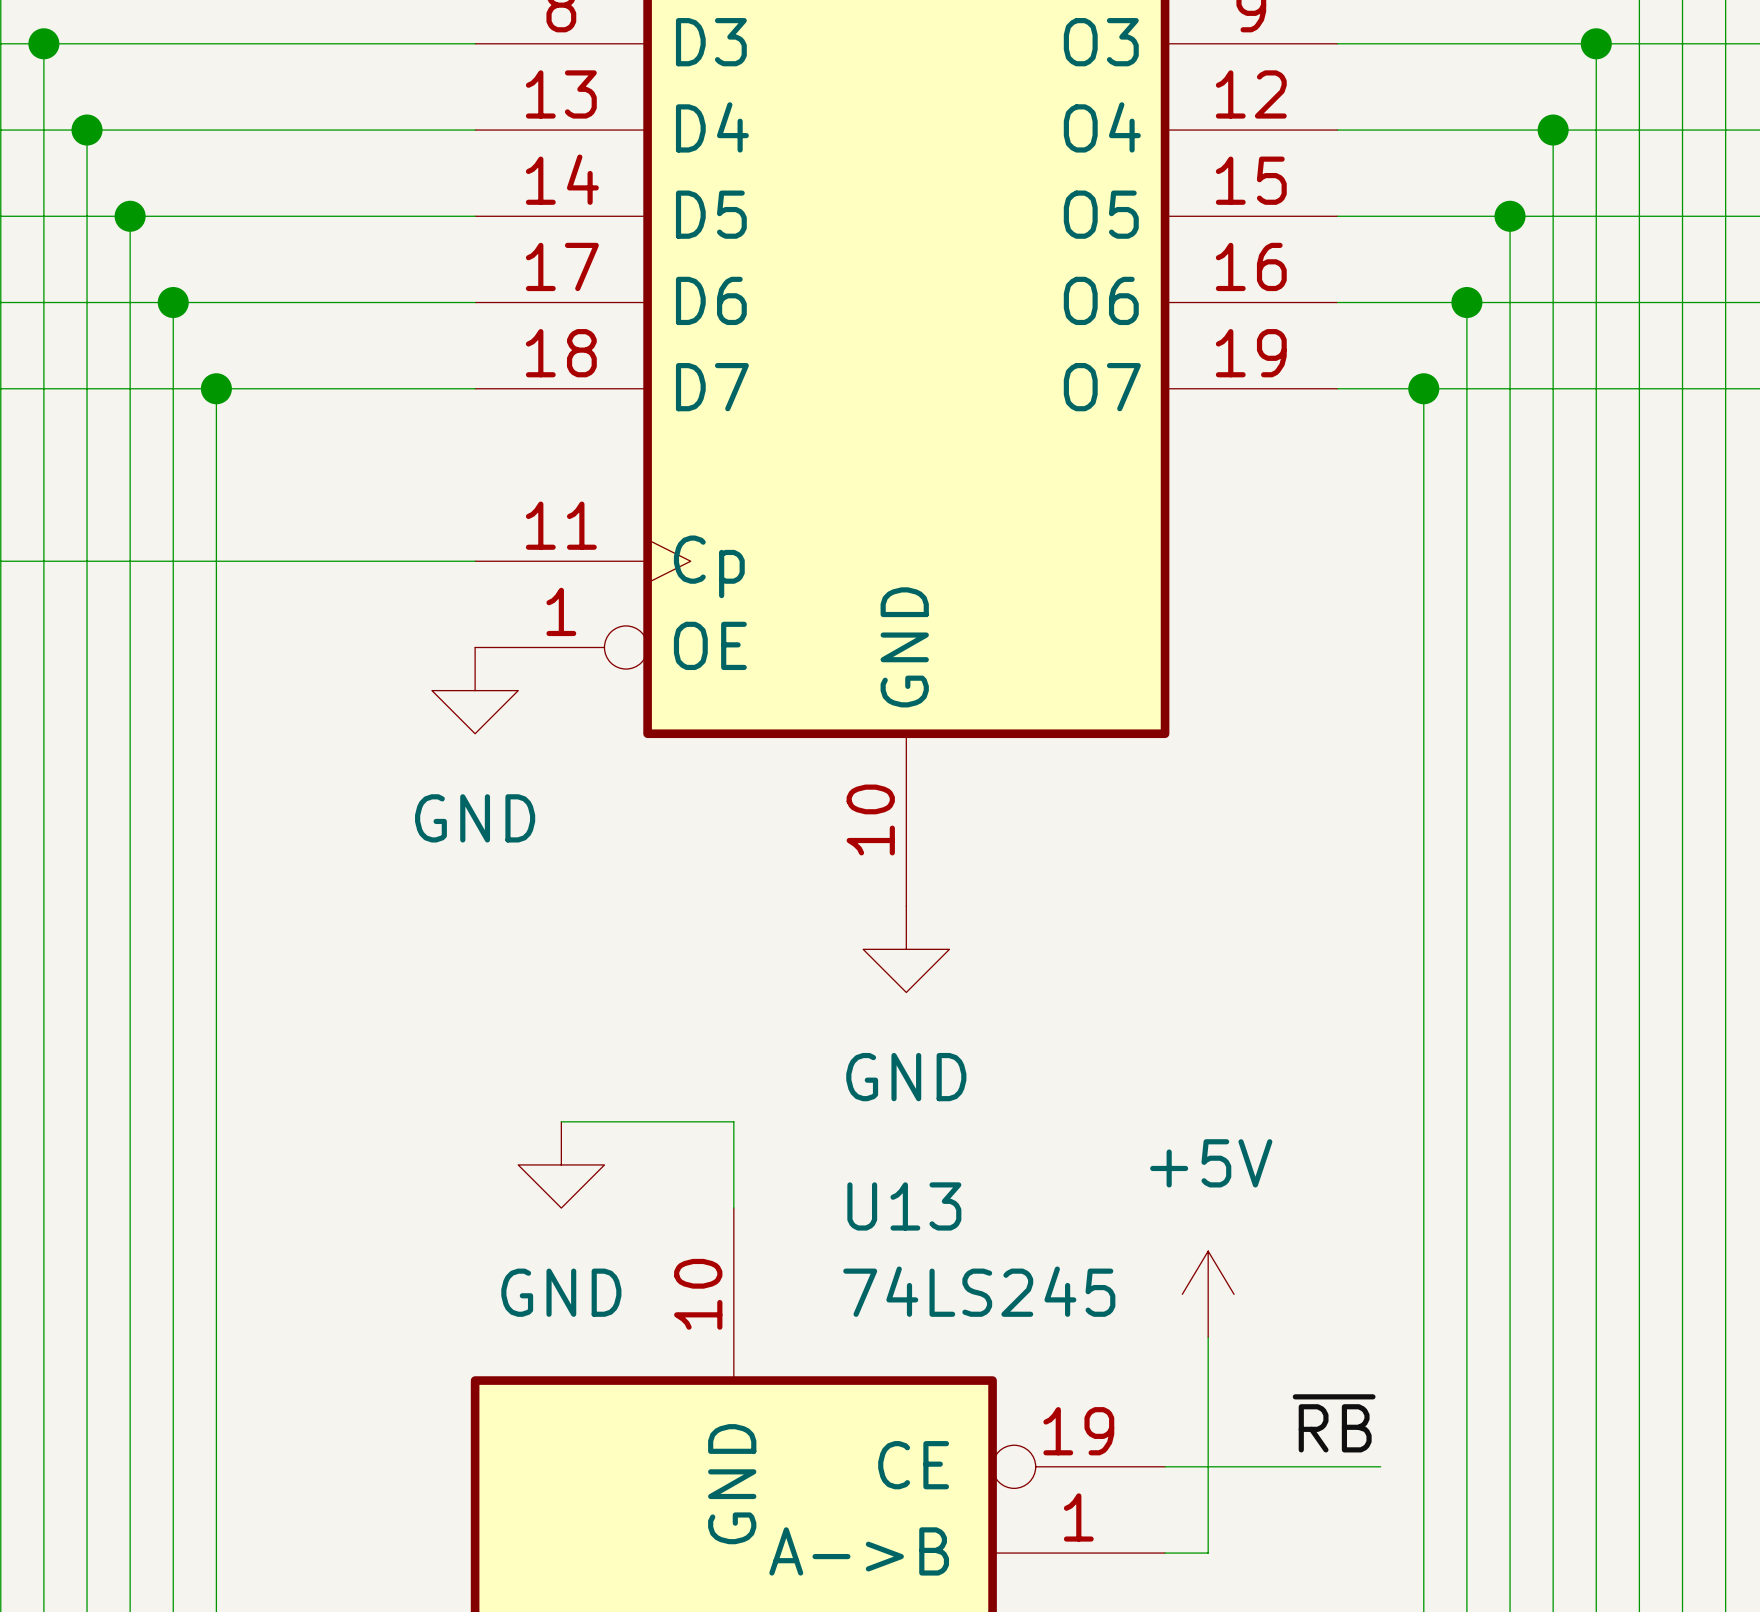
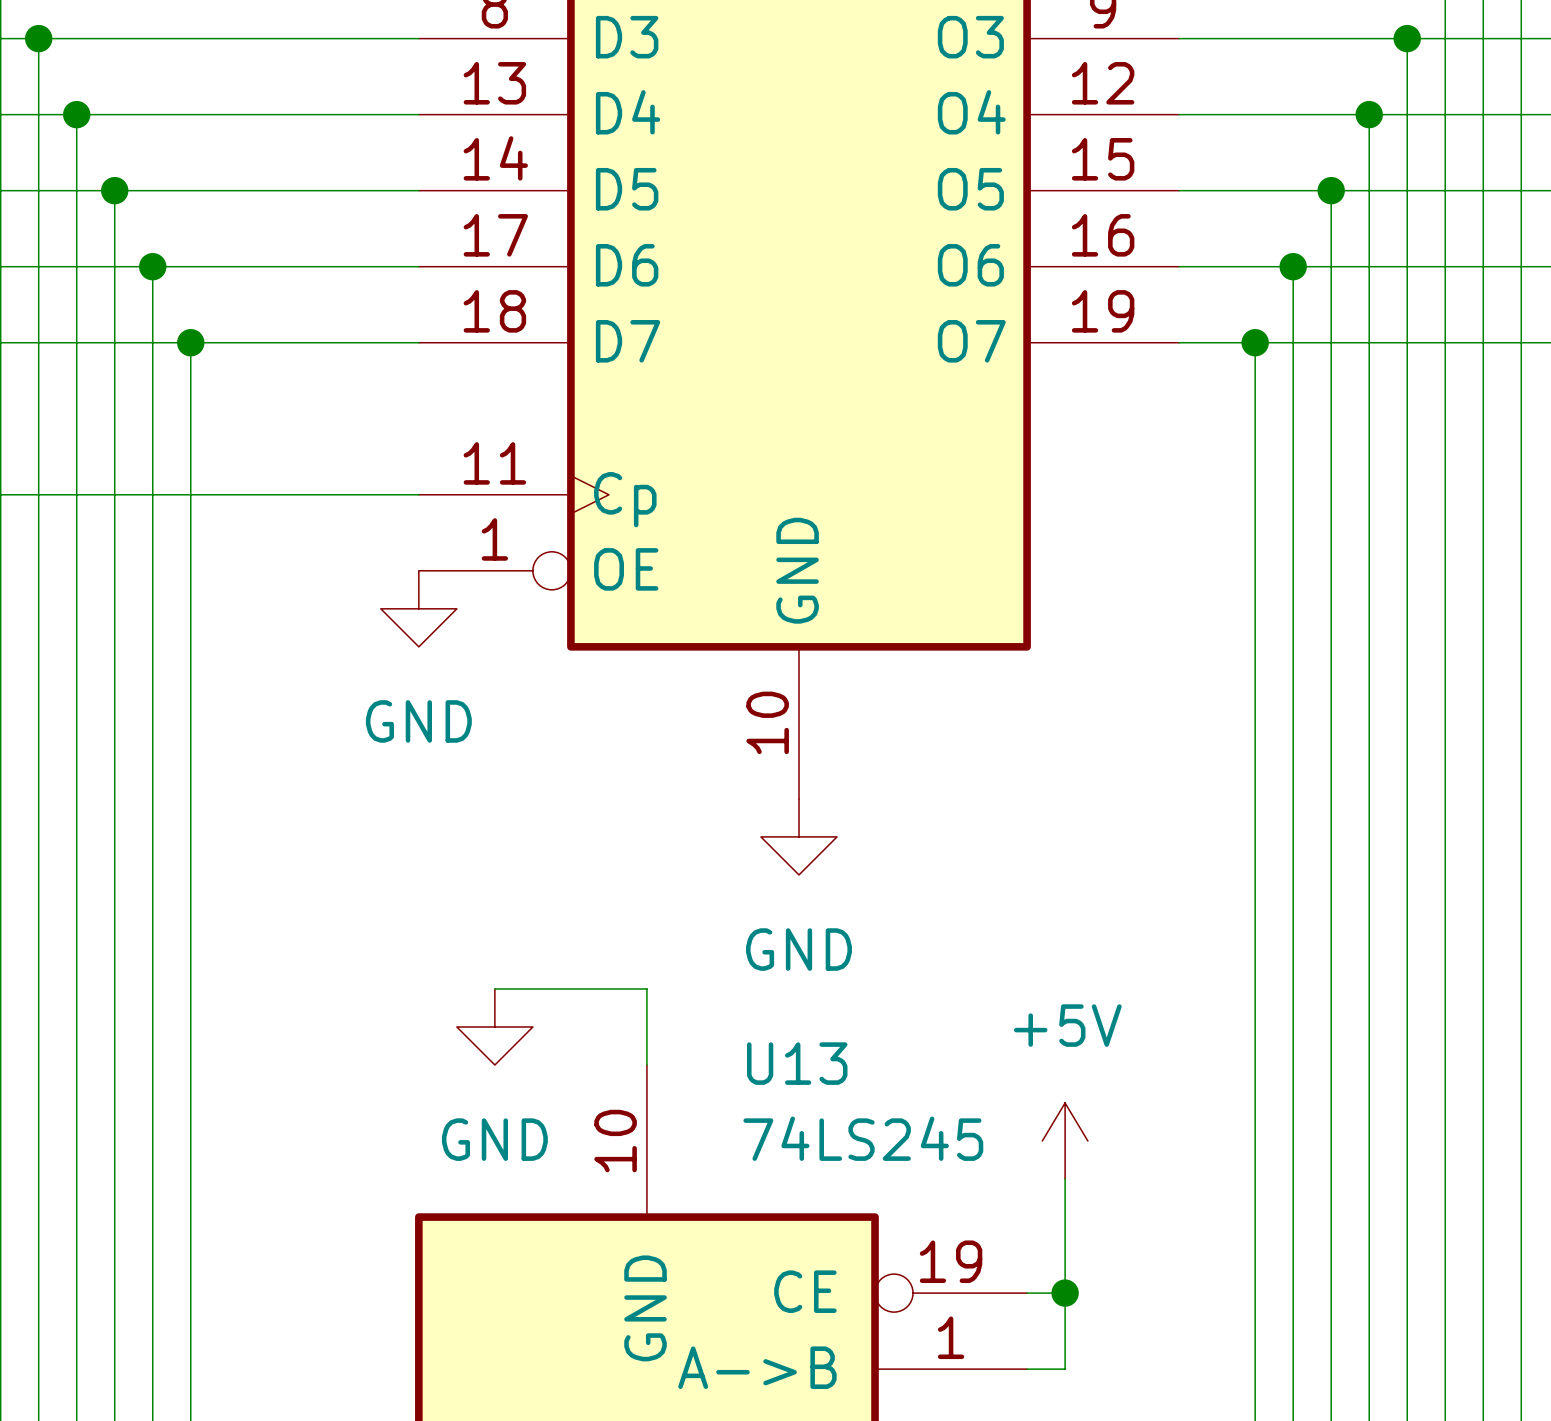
label: ~{RB} (1334, 1423) -> none
wire: (1208, 1466) (1380, 1466) -> none
junction: none -> (1065, 1293)

